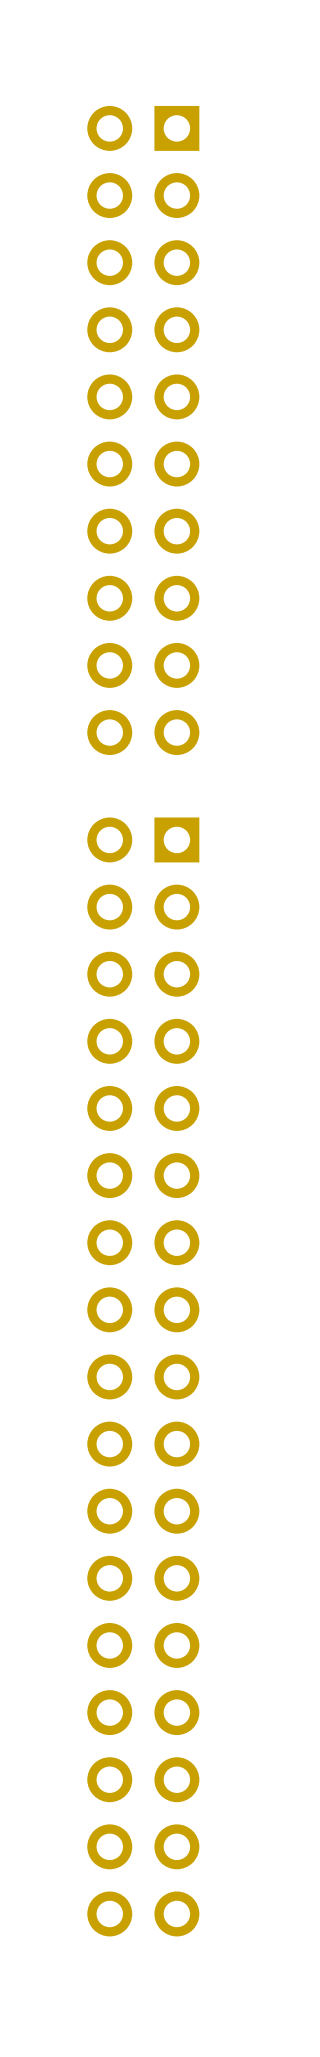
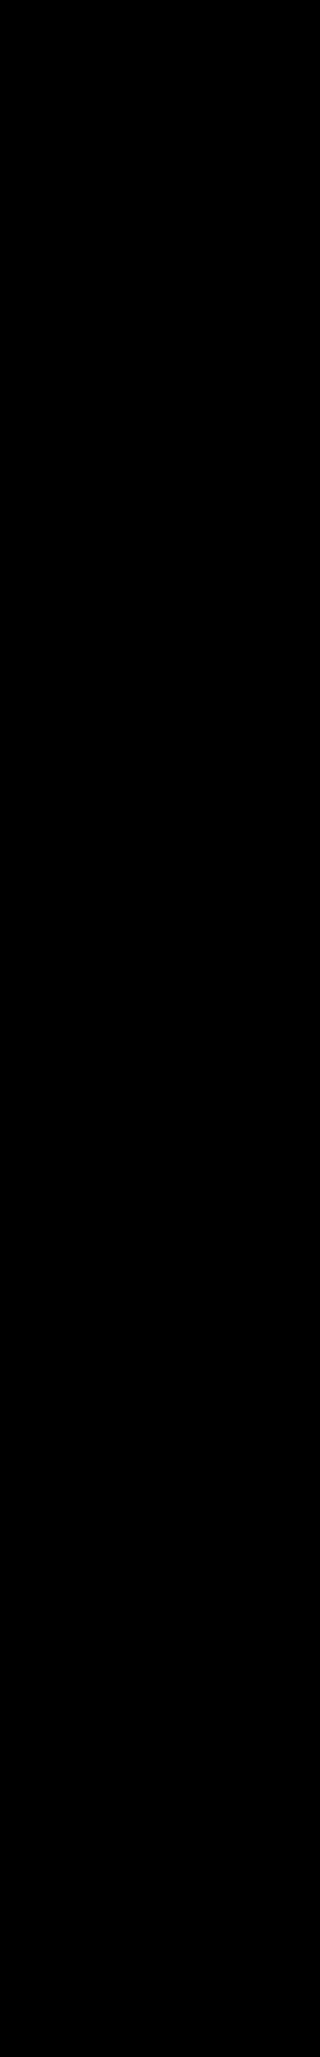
part: (143, 430) -> none
part: (143, 1376) -> none

